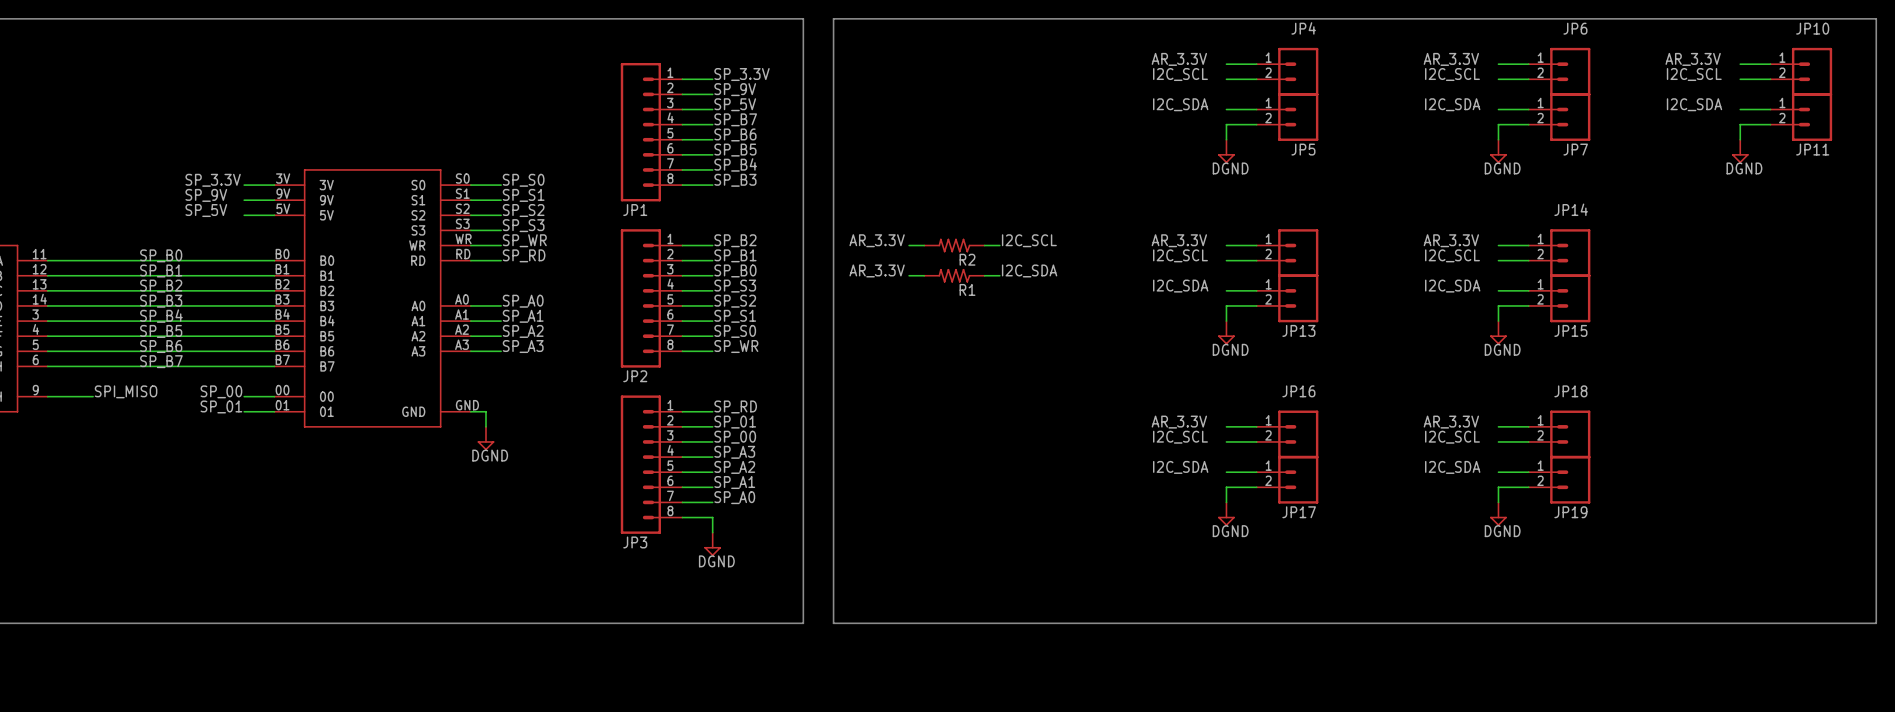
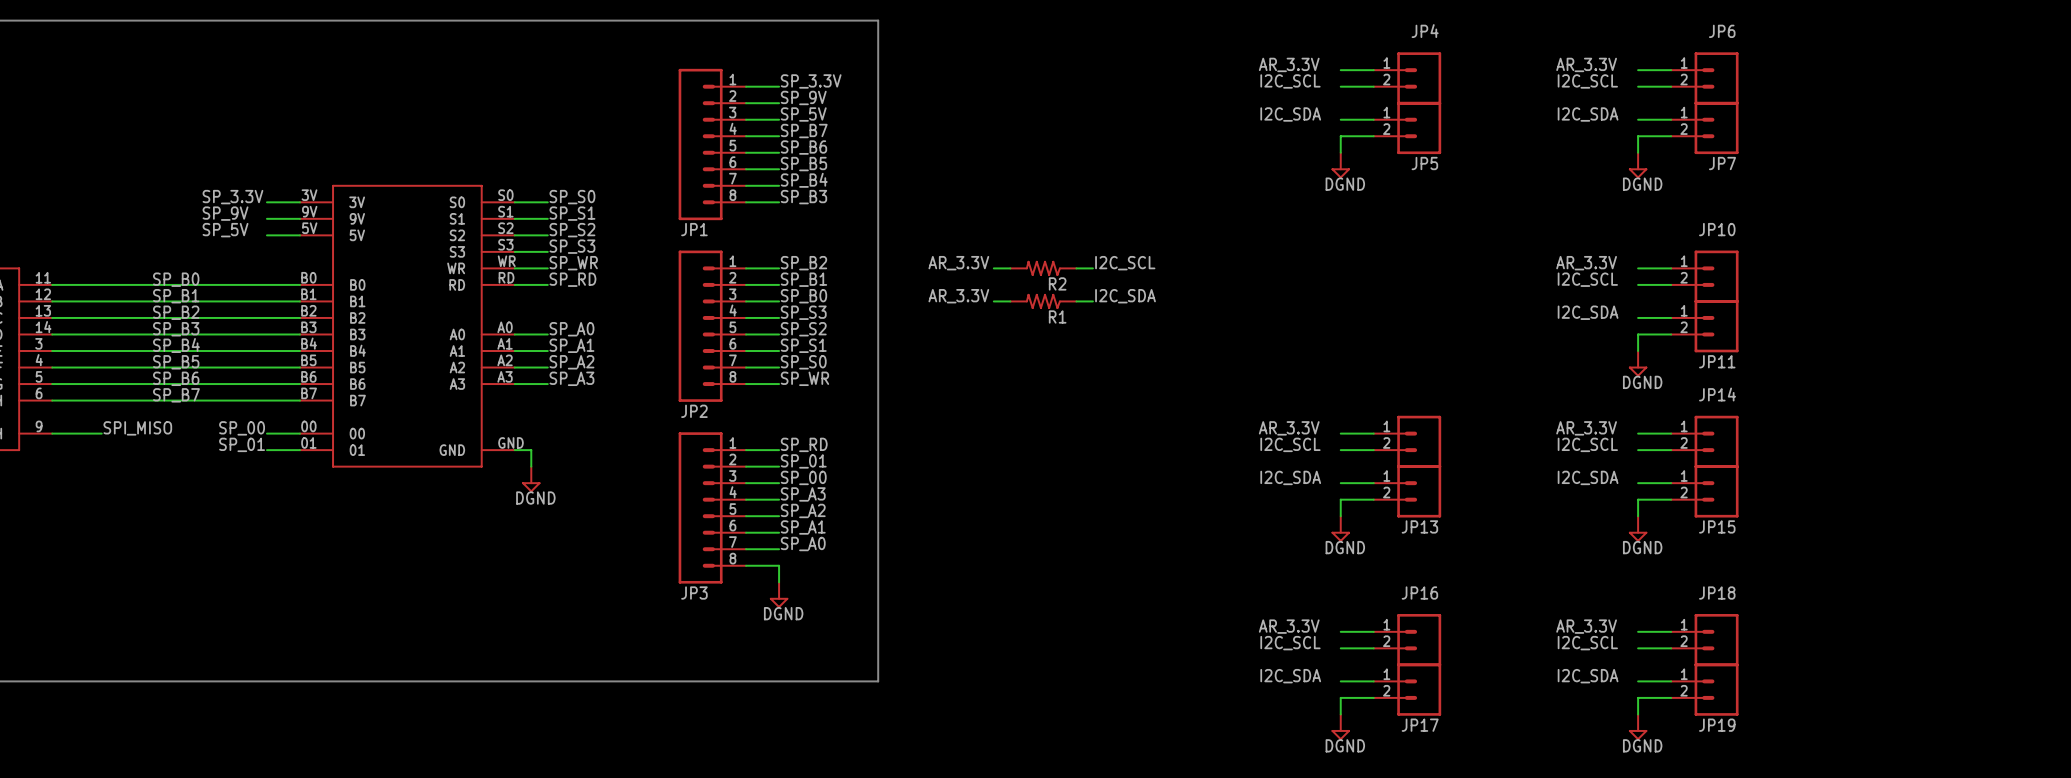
line: (833, 18) (1876, 18) (1876, 623) (833, 623) (833, 18) -> none
label: AR_3.3V (1693, 59) -> none
wire: (1740, 64) (1770, 64) -> none
JP10: (1801, 71) -> none
label: I2C_SCL (1694, 74) -> none
wire: (1740, 79) (1770, 79) -> none
label: I2C_SDA (1694, 104) -> none
wire: (1740, 109) (1770, 109) -> none
JP11: (1801, 117) -> none
wire: (1770, 124) (1740, 124) (1740, 139) -> none
power symbol: DGND (1740, 151) -> none
JP14 name: JP14 (1571, 209) -> JP10 (1717, 229)
label: AR_3.3V (1179, 240) -> none
wire: (1226, 245) (1256, 245) -> none
part: (1287, 253) -> none
label: I2C_SCL (1180, 255) -> none
wire: (1226, 260) (1256, 260) -> none
label: I2C_SDA (1180, 286) -> none
wire: (1226, 290) (1256, 290) -> (1340, 450) (1373, 450)
JP13 position: (1287, 298) -> (1407, 491)
wire: (1256, 305) (1226, 305) (1226, 321) -> none
JP15 name: JP15 (1570, 330) -> JP11 (1717, 361)
power symbol: DGND (1226, 332) -> none
part: none -> (1407, 441)
JP14: none -> (1704, 441)
label: none -> I2C_SCL (1290, 444)
label: none -> I2C_SCL (1587, 444)
wire: none -> (1638, 450) (1671, 450)
label position: AR_3.3V (1179, 422) -> AR_3.3V (1289, 428)
label position: AR_3.3V (1451, 422) -> AR_3.3V (1586, 428)
wire: (1226, 426) (1256, 426) -> (1340, 433) (1373, 433)
wire: (1498, 426) (1528, 426) -> (1638, 433) (1671, 433)
JP16 position: (1287, 434) -> (1407, 640)
JP18 position: (1559, 434) -> (1704, 640)
label: I2C_SCL (1180, 437) -> I2C_SDA (1290, 477)
label: I2C_SCL (1452, 437) -> I2C_SDA (1588, 477)
JP15: none -> (1704, 491)
label: I2C_SDA (1180, 467) -> none
label: I2C_SDA (1452, 467) -> none
wire: (1226, 472) (1256, 472) -> (1340, 516) (1340, 499) (1373, 499)
wire: (1498, 472) (1528, 472) -> (1638, 516) (1638, 499) (1671, 499)
JP17 position: (1287, 479) -> (1407, 689)
JP19 position: (1559, 479) -> (1704, 689)
wire: (1256, 487) (1226, 487) (1226, 502) -> none
wire: (1528, 487) (1498, 487) (1498, 502) -> none
power symbol position: DGND (1226, 514) -> DGND (1340, 529)
power symbol position: DGND (1498, 514) -> DGND (1638, 529)
label: none -> AR_3.3V (1289, 626)
label: none -> AR_3.3V (1586, 626)
wire: none -> (1340, 631) (1373, 631)
wire: none -> (1638, 631) (1671, 631)
label: none -> I2C_SCL (1290, 643)
label: none -> I2C_SCL (1587, 643)
wire: none -> (1340, 648) (1373, 648)
wire: none -> (1638, 648) (1671, 648)
label: none -> I2C_SDA (1290, 676)
label: none -> I2C_SDA (1588, 676)
wire: none -> (1373, 697) (1340, 697) (1340, 714)
wire: none -> (1671, 697) (1638, 697) (1638, 714)
power symbol: none -> DGND (1340, 727)
power symbol: none -> DGND (1638, 727)

